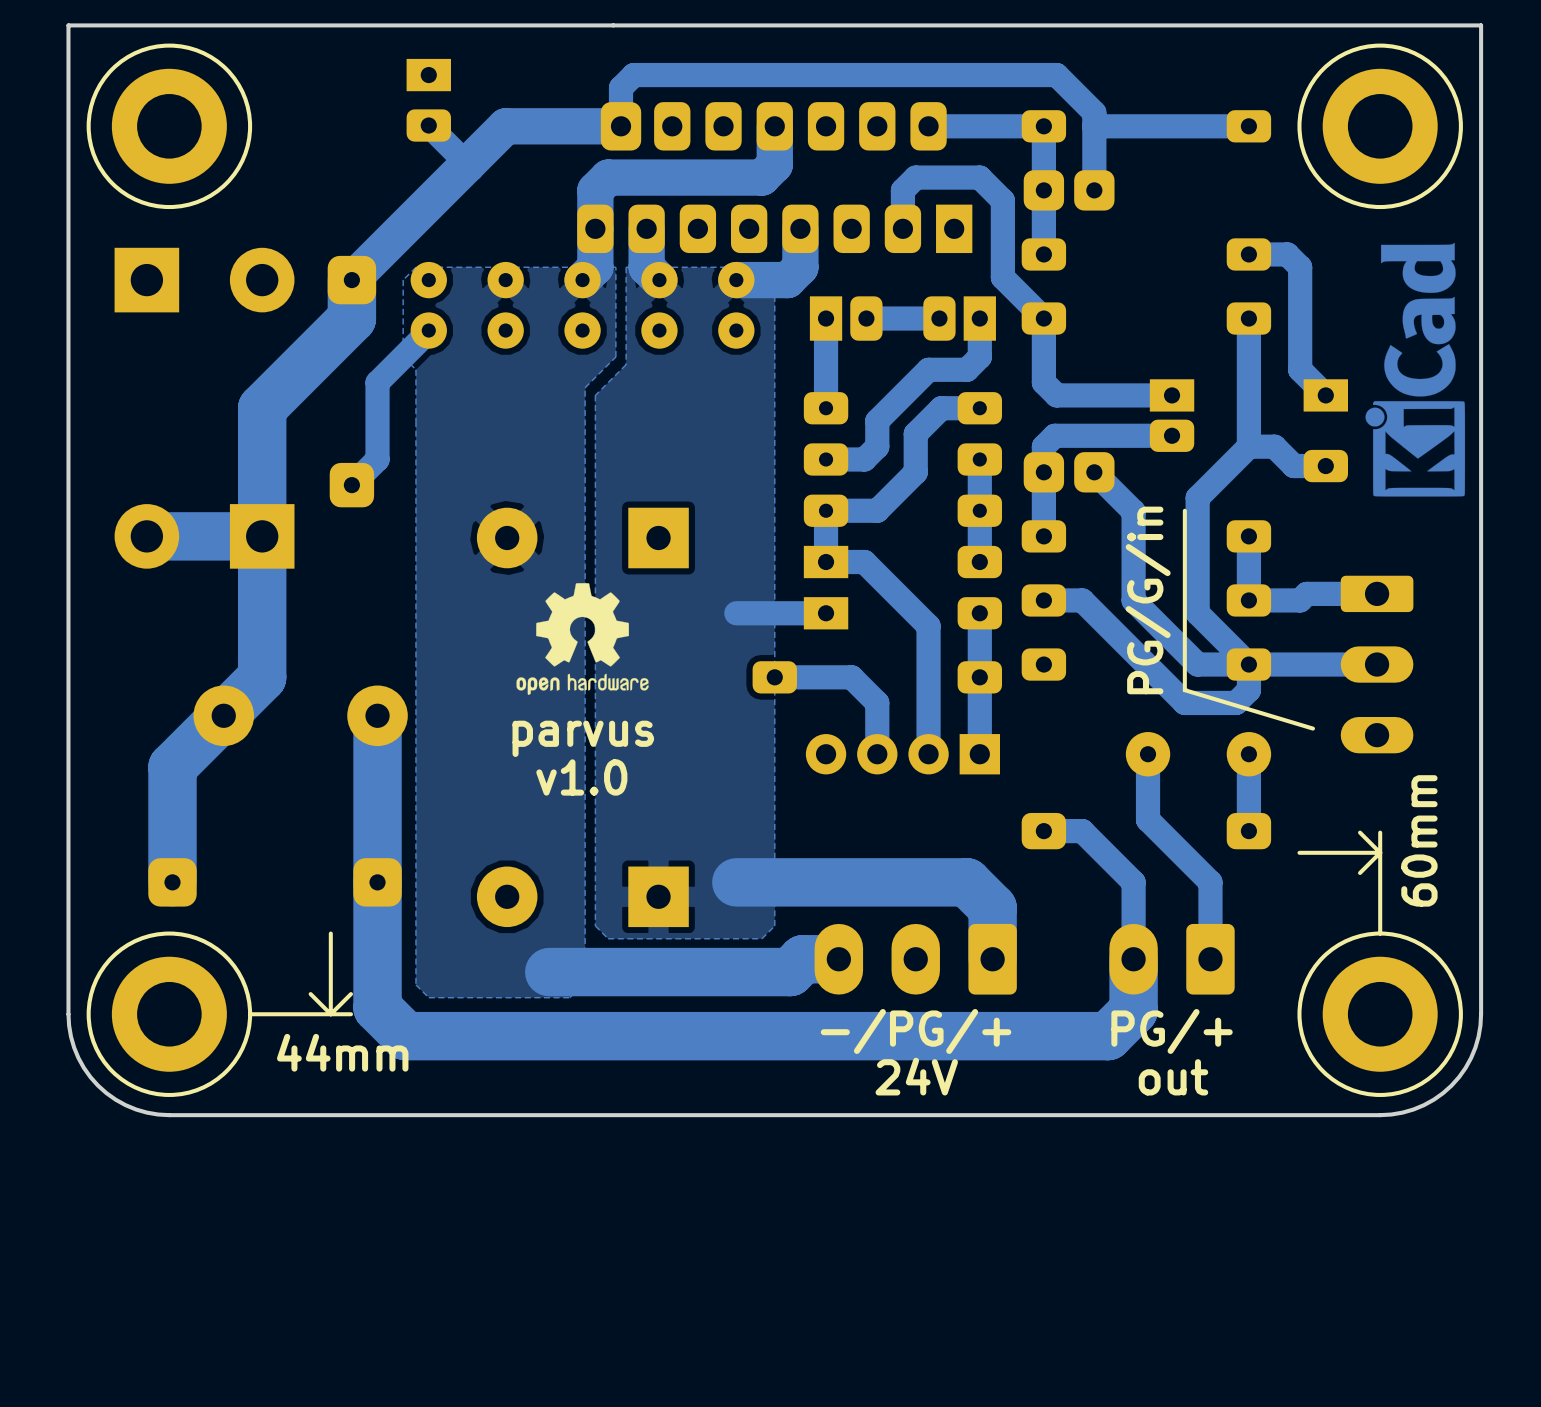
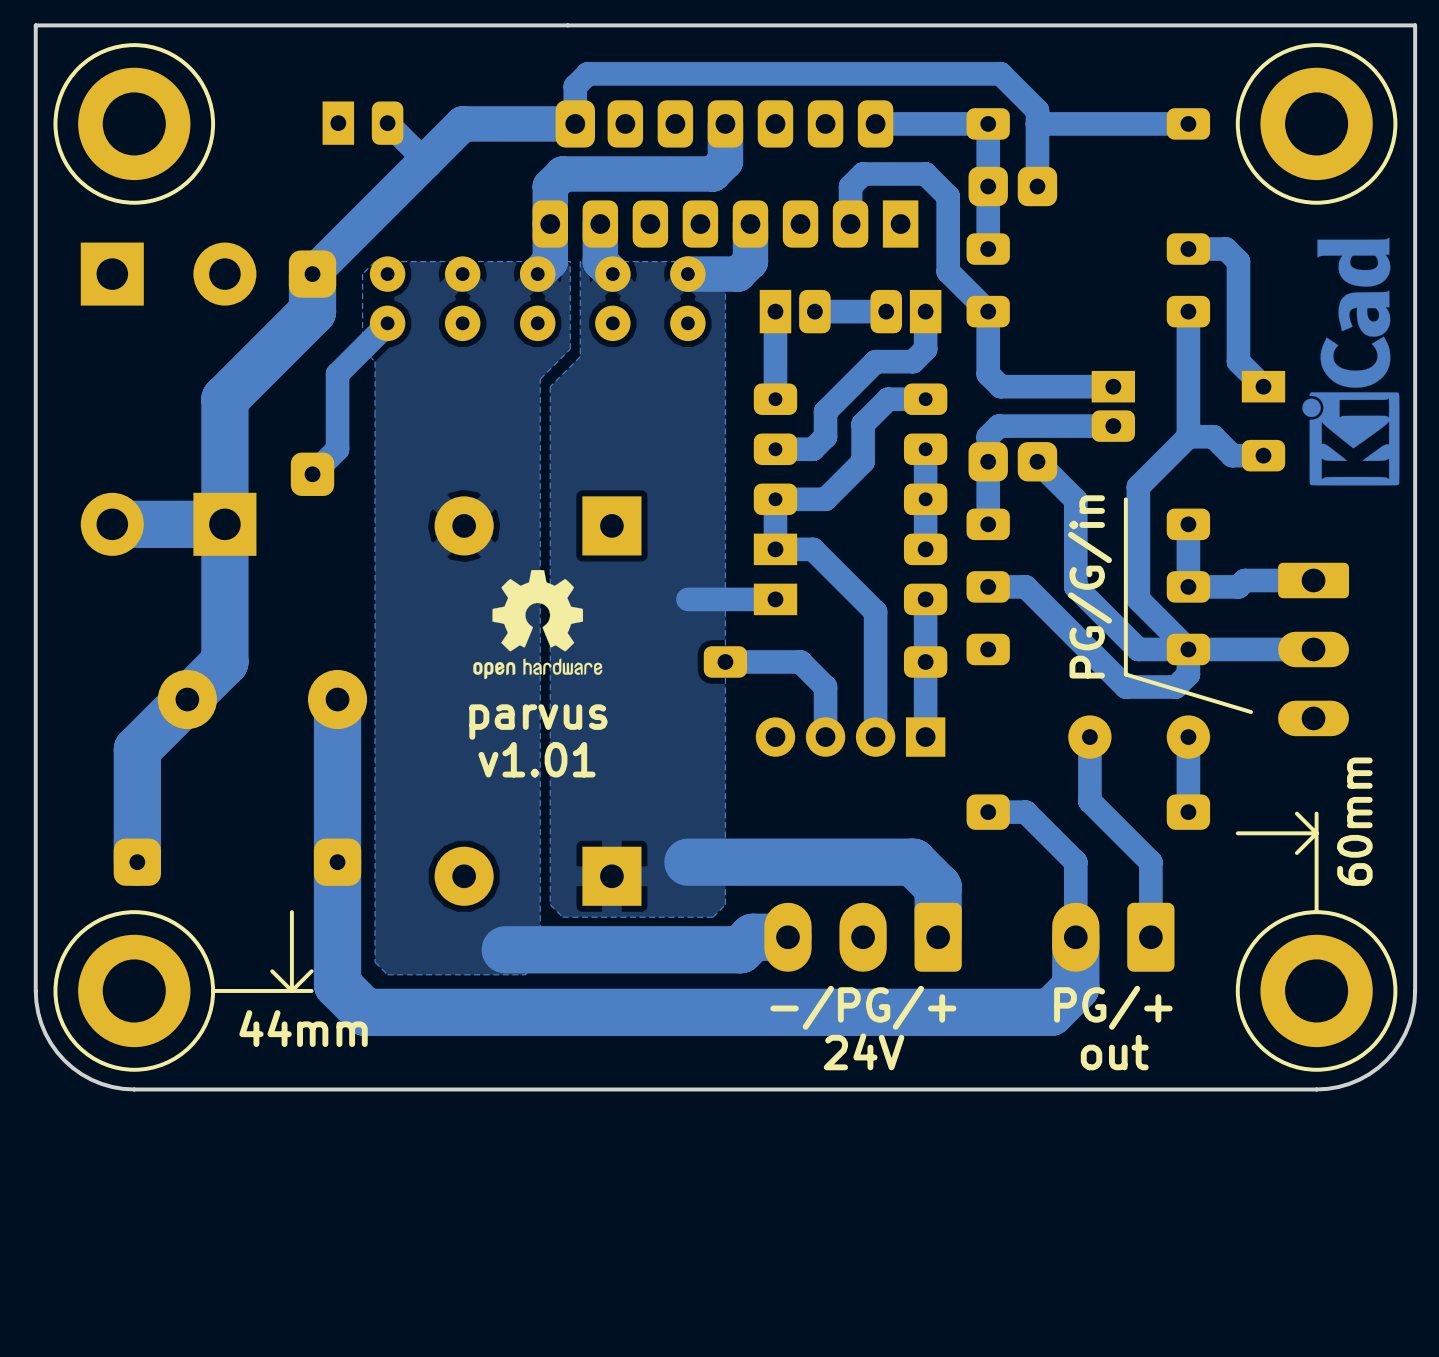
part rotation: 0° (428, 100) -> 90° counterclockwise (362, 123)
text: v1.0 (581, 777) -> v1.01 (537, 759)

